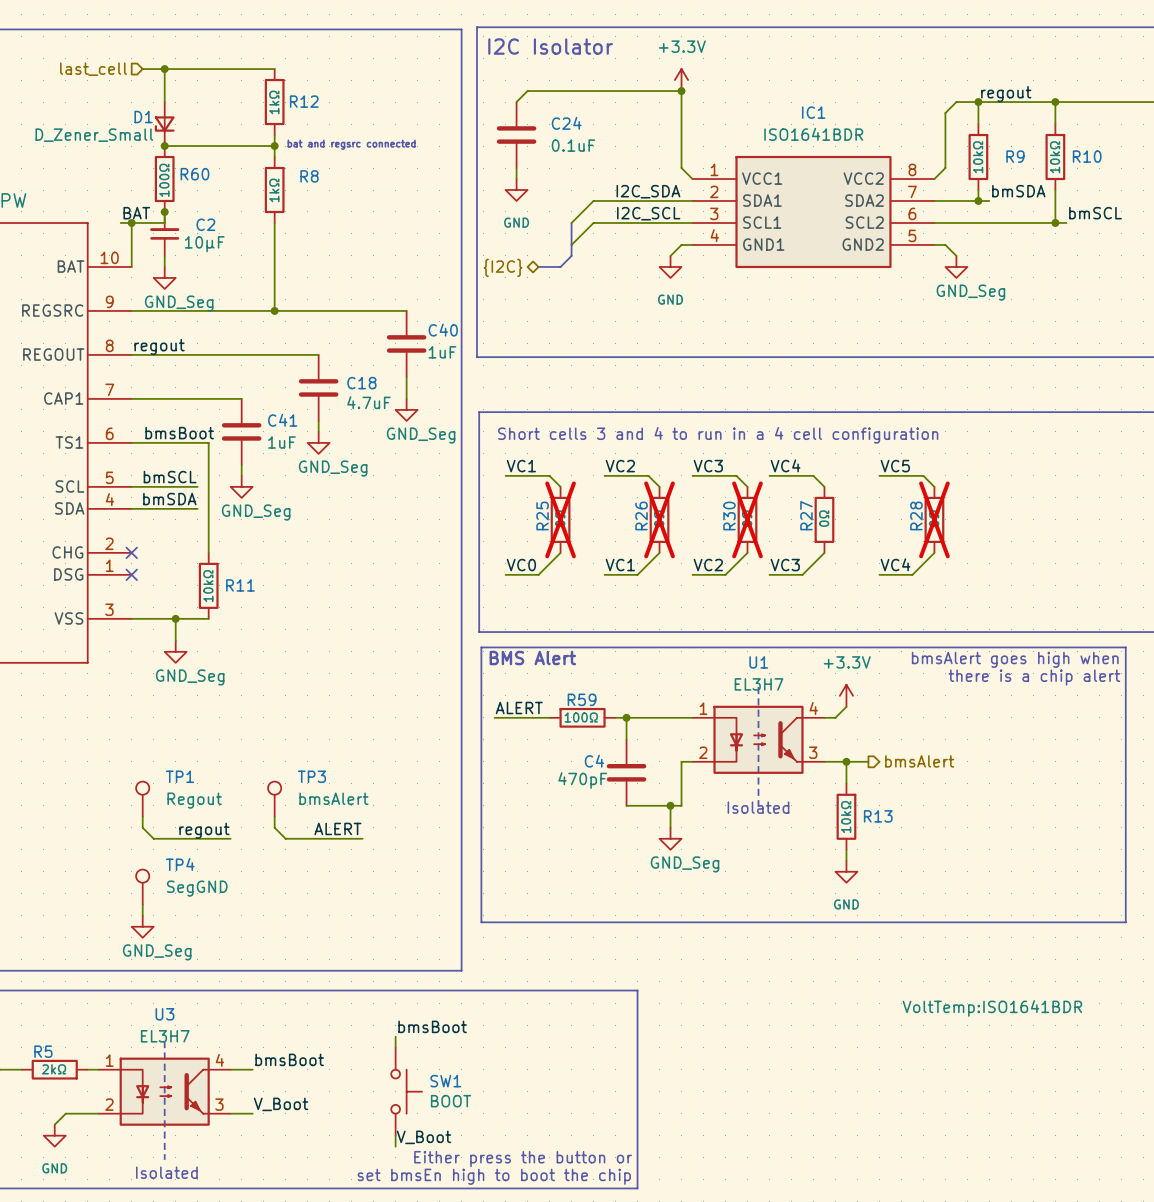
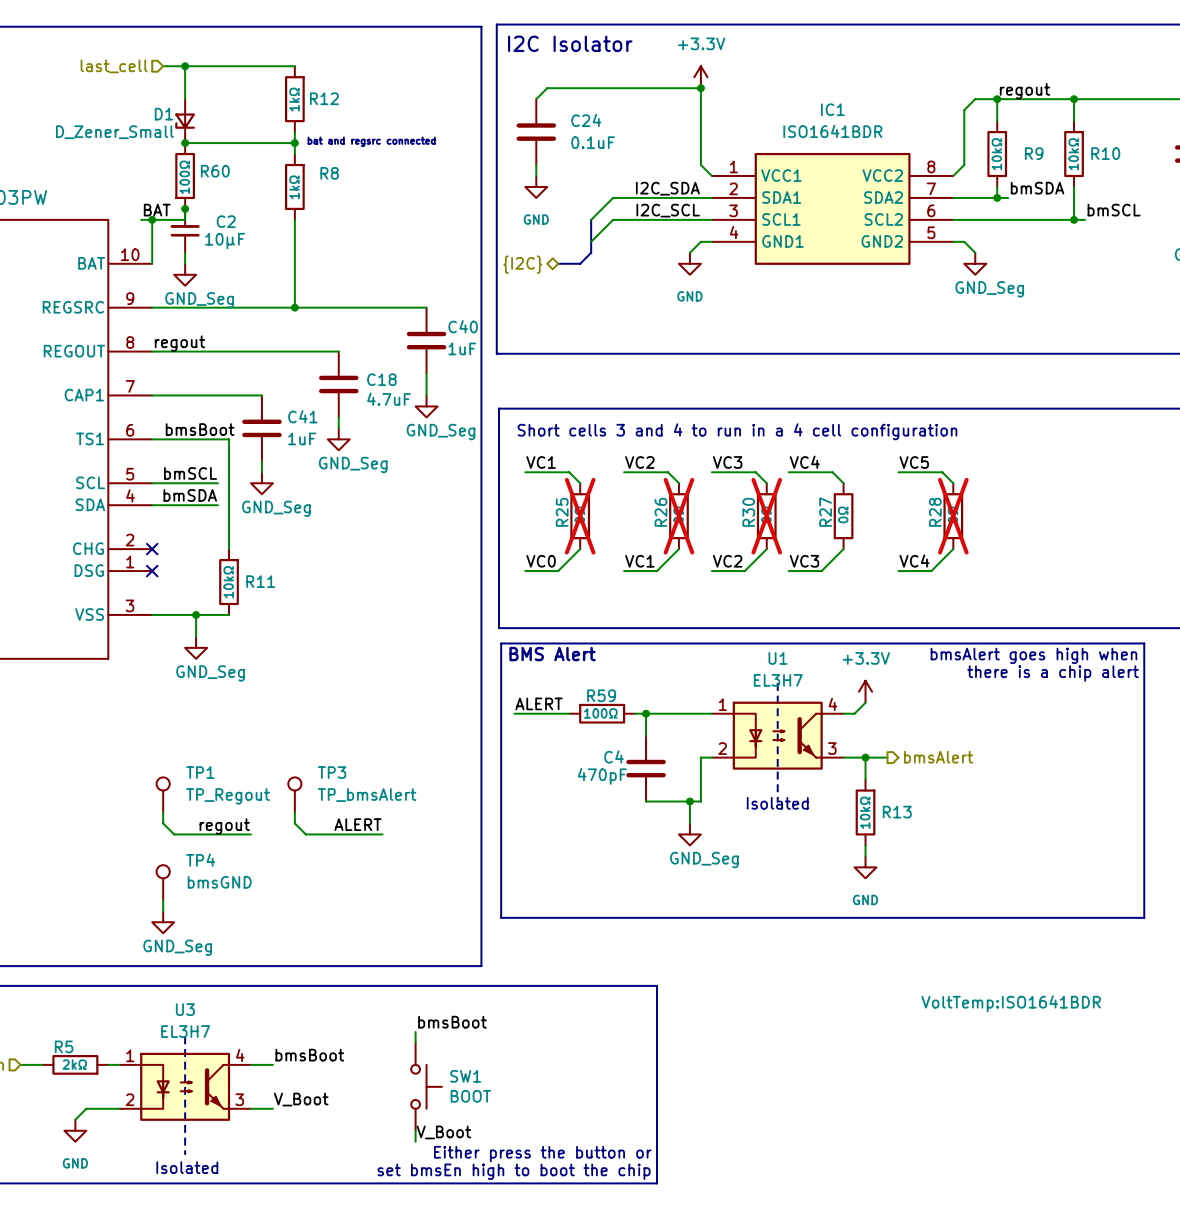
TP3 value: bmsAlert (333, 798) -> TP_bmsAlert (367, 795)
TP1 value: Regout (194, 800) -> TP_Regout (228, 796)
TP4 value: SegGND (197, 888) -> bmsGND (219, 882)

